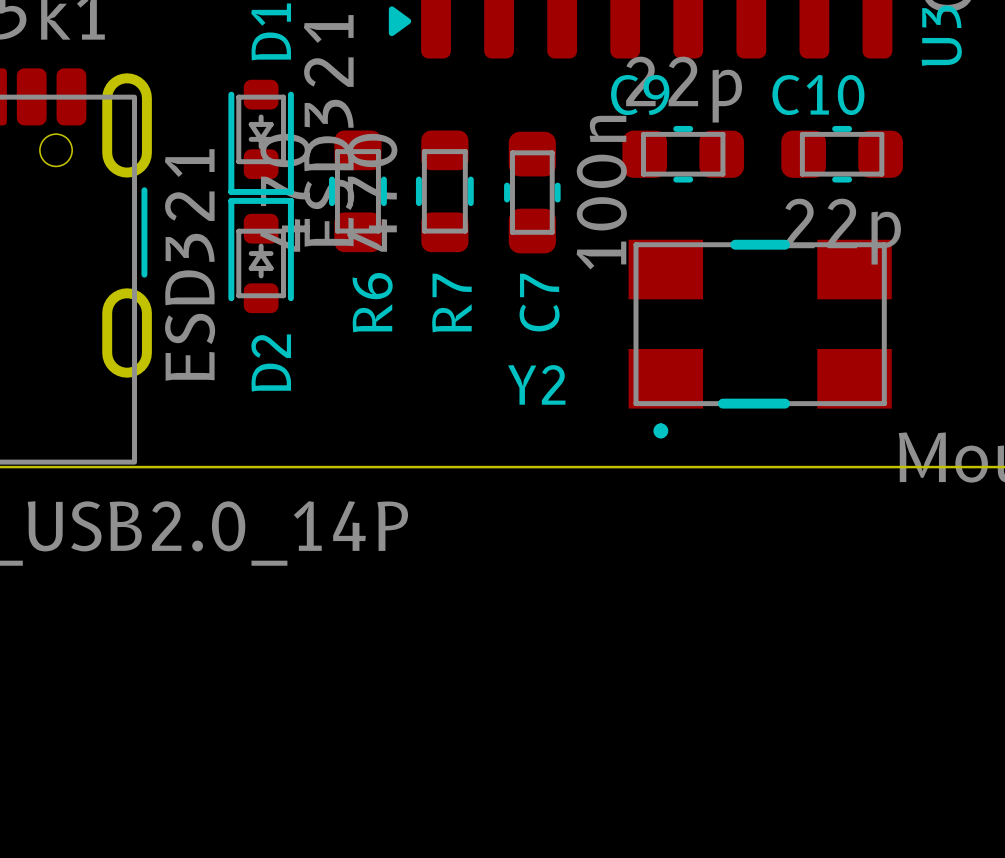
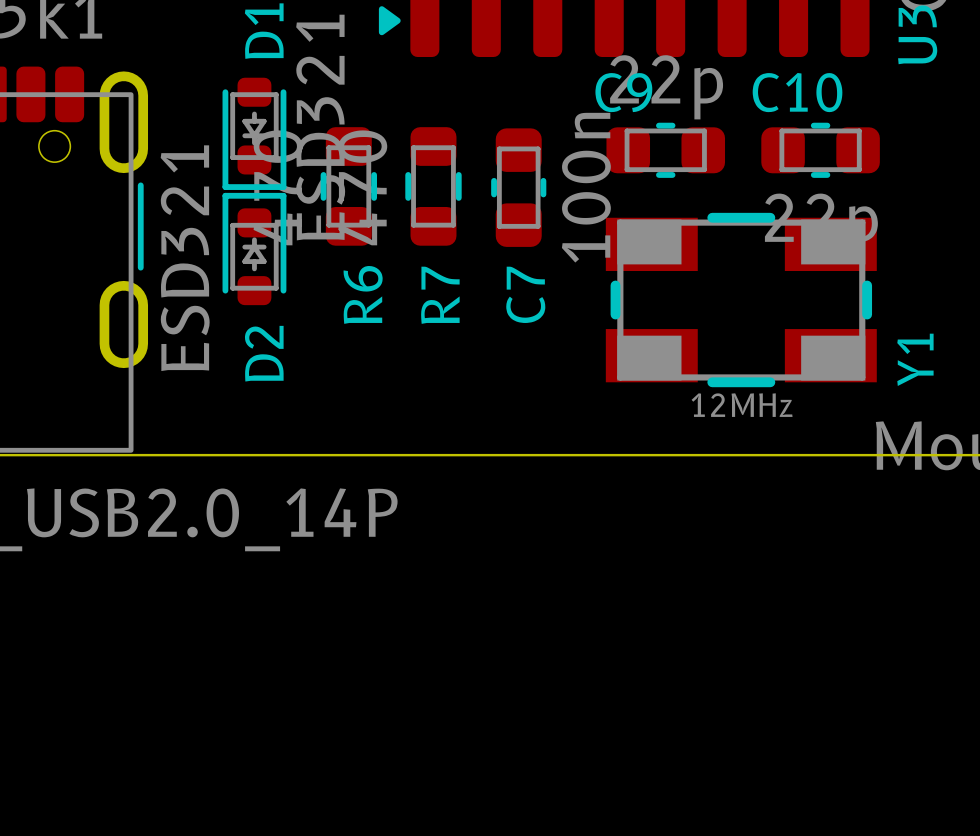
Y1: none -> 12MHz (741, 300)
Y2: (760, 339) -> none

